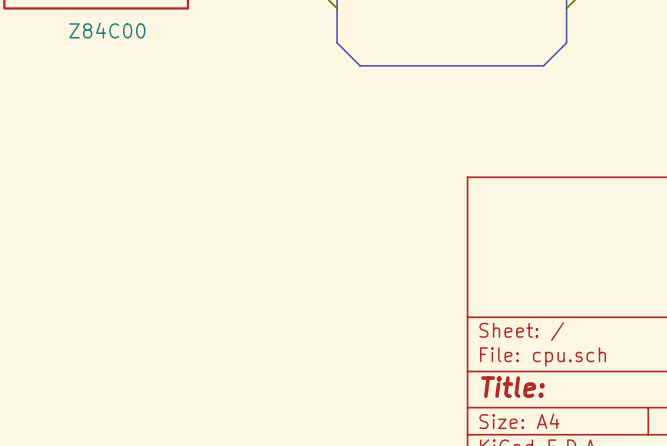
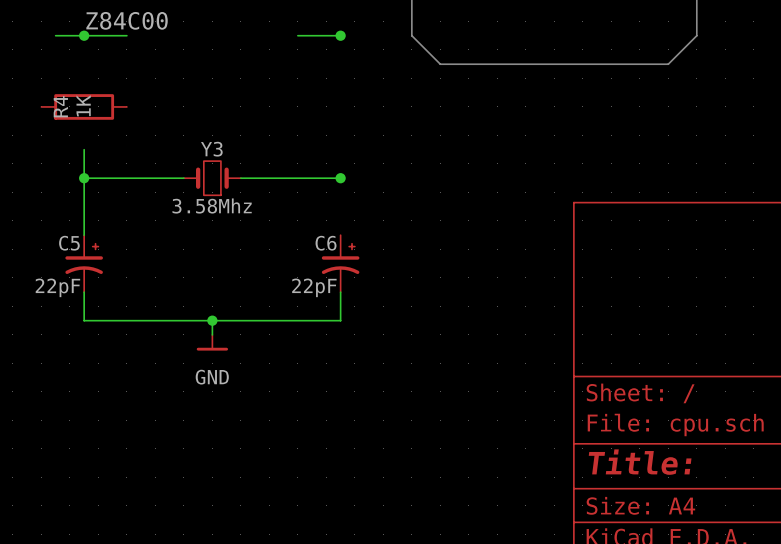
wire: none -> (55, 35) (126, 35)
junction: none -> (84, 35)
wire: none -> (297, 35) (340, 35)
junction: none -> (340, 35)
R4: none -> 1K (84, 106)
wire: none -> (84, 149) (84, 235)
wire: none -> (84, 178) (183, 178)
junction: none -> (84, 178)
Y3: none -> 3.58Mhz (212, 178)
wire: none -> (240, 178) (340, 178)
junction: none -> (340, 178)
C5: none -> 22pF (84, 263)
C6: none -> 22pF (340, 263)
wire: none -> (84, 292) (84, 320) (340, 320) (340, 292)
wire: none -> (212, 320) (212, 334)
junction: none -> (212, 320)
power symbol: none -> GND (212, 342)

